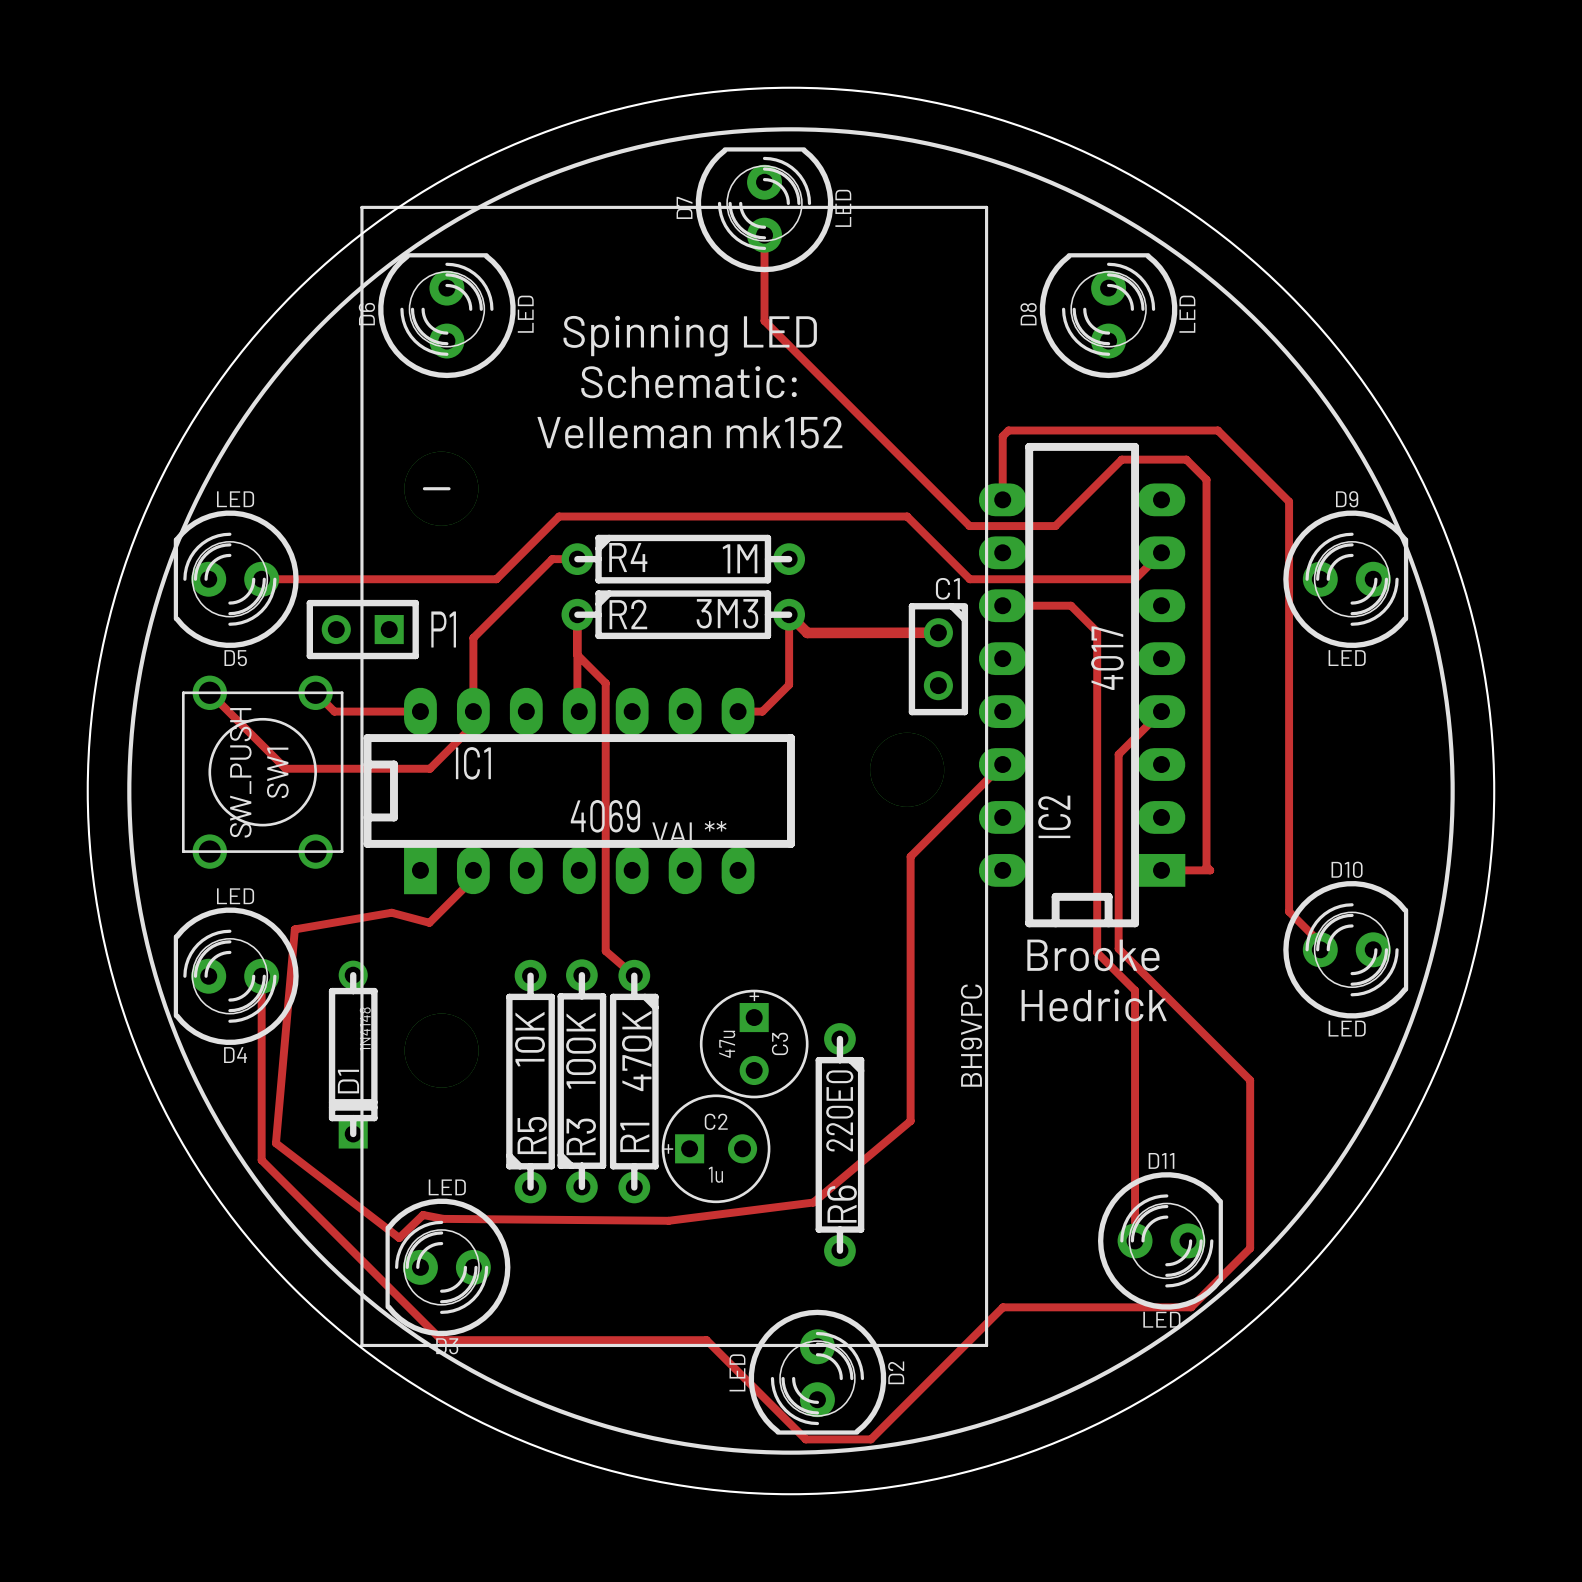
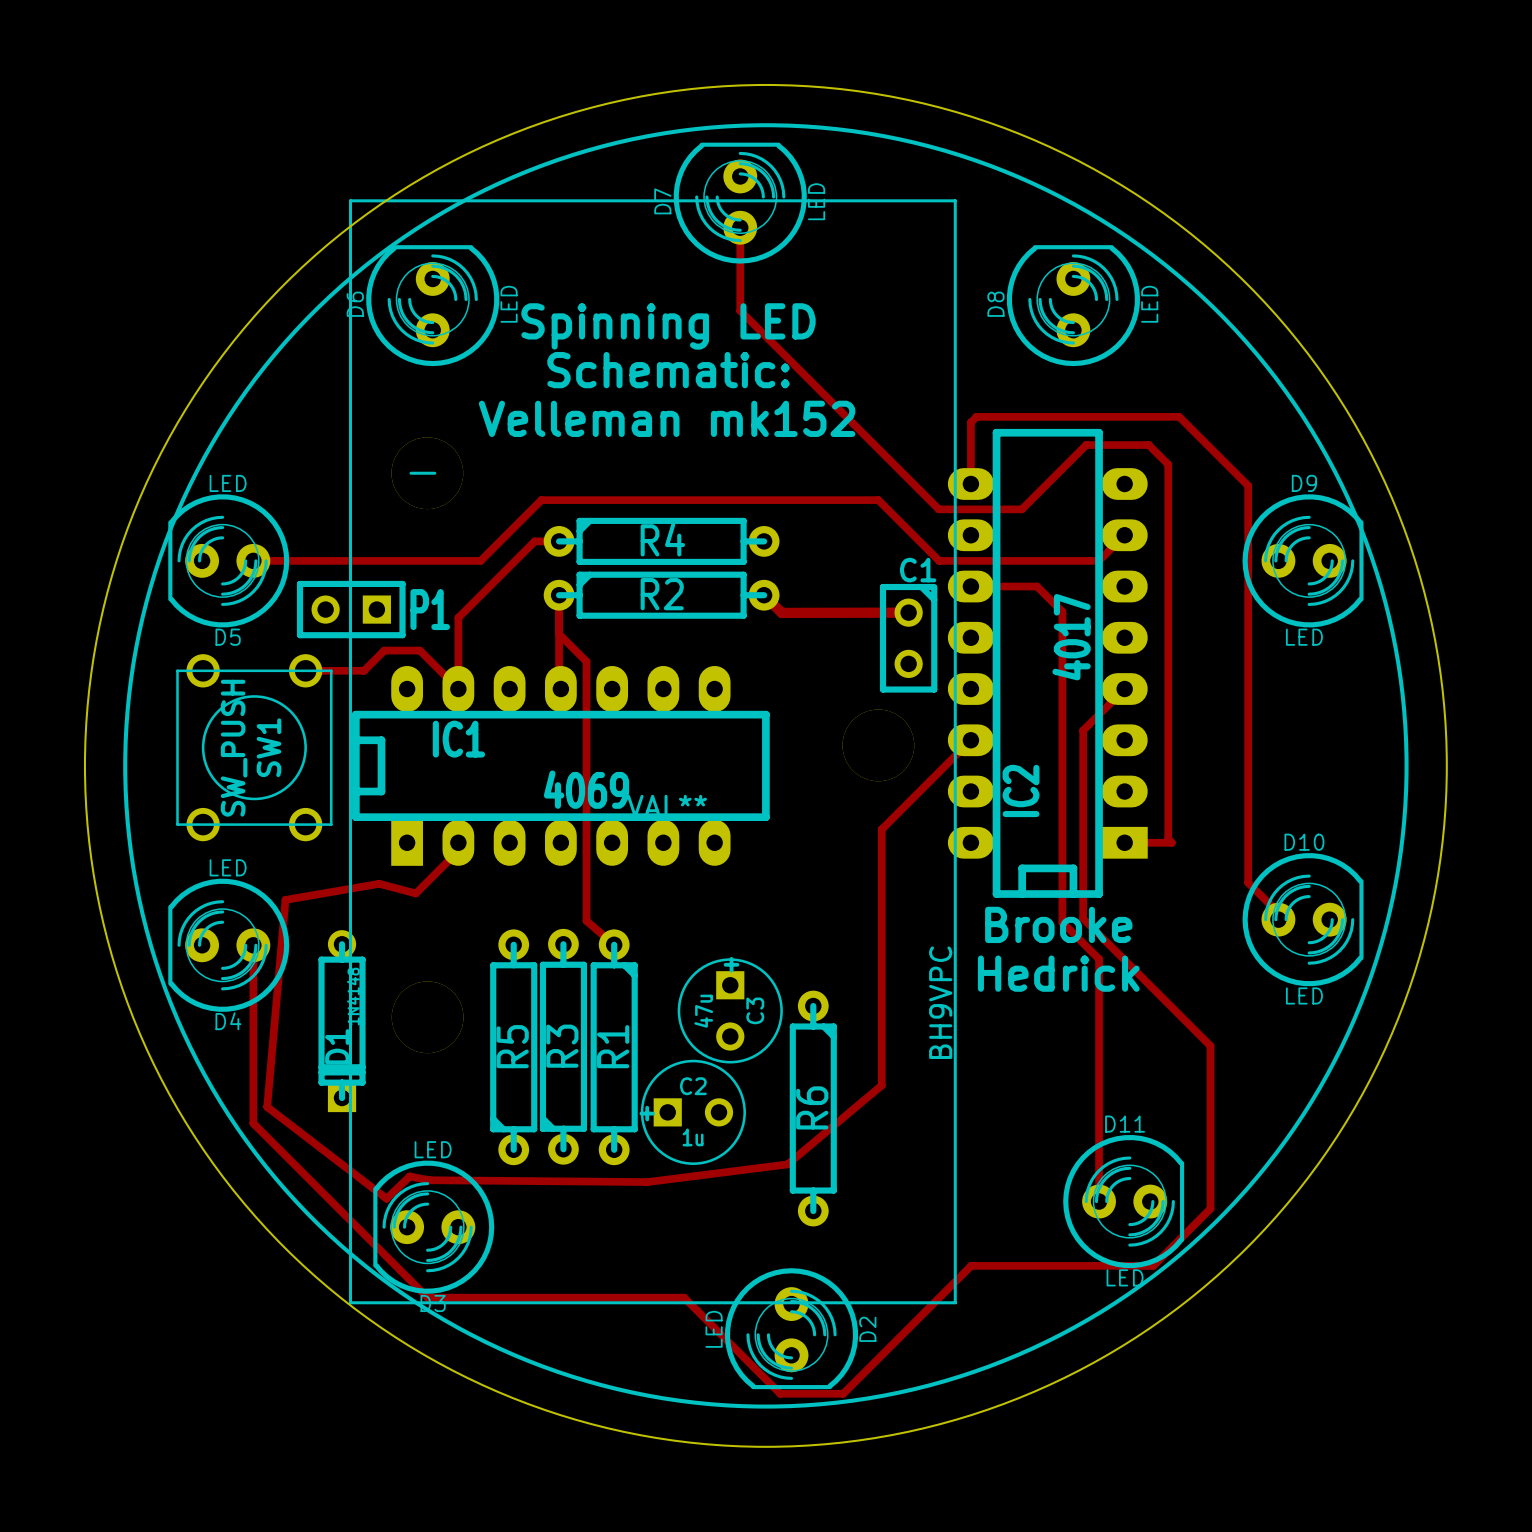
R4 name position: R4 (628, 557) -> R4 (662, 539)
R4 value: 1M (740, 558) -> none
R2 value: 3M3 (727, 613) -> none
R2 name position: R2 (628, 614) -> R2 (662, 594)
track: (789, 614) (789, 684) (762, 711) (738, 711) -> none
track: (209, 692) (285, 768) (429, 768) (473, 725) (473, 711) -> none
track: (315, 692) (334, 711) (420, 711) -> (305, 670) (364, 670) (384, 650) (419, 650) (458, 689)
R5 value: 10K (530, 1039) -> none
R3 value: 100K (581, 1050) -> none
R1 value: 470K (636, 1050) -> none
R6 value: 220E0 (839, 1110) -> none
R5 name position: R5 (532, 1135) -> R5 (512, 1046)
R3 name position: R3 (581, 1136) -> R3 (562, 1046)
R1 name position: R1 (634, 1137) -> R1 (613, 1046)
R6 name position: R6 (842, 1204) -> R6 (812, 1107)

